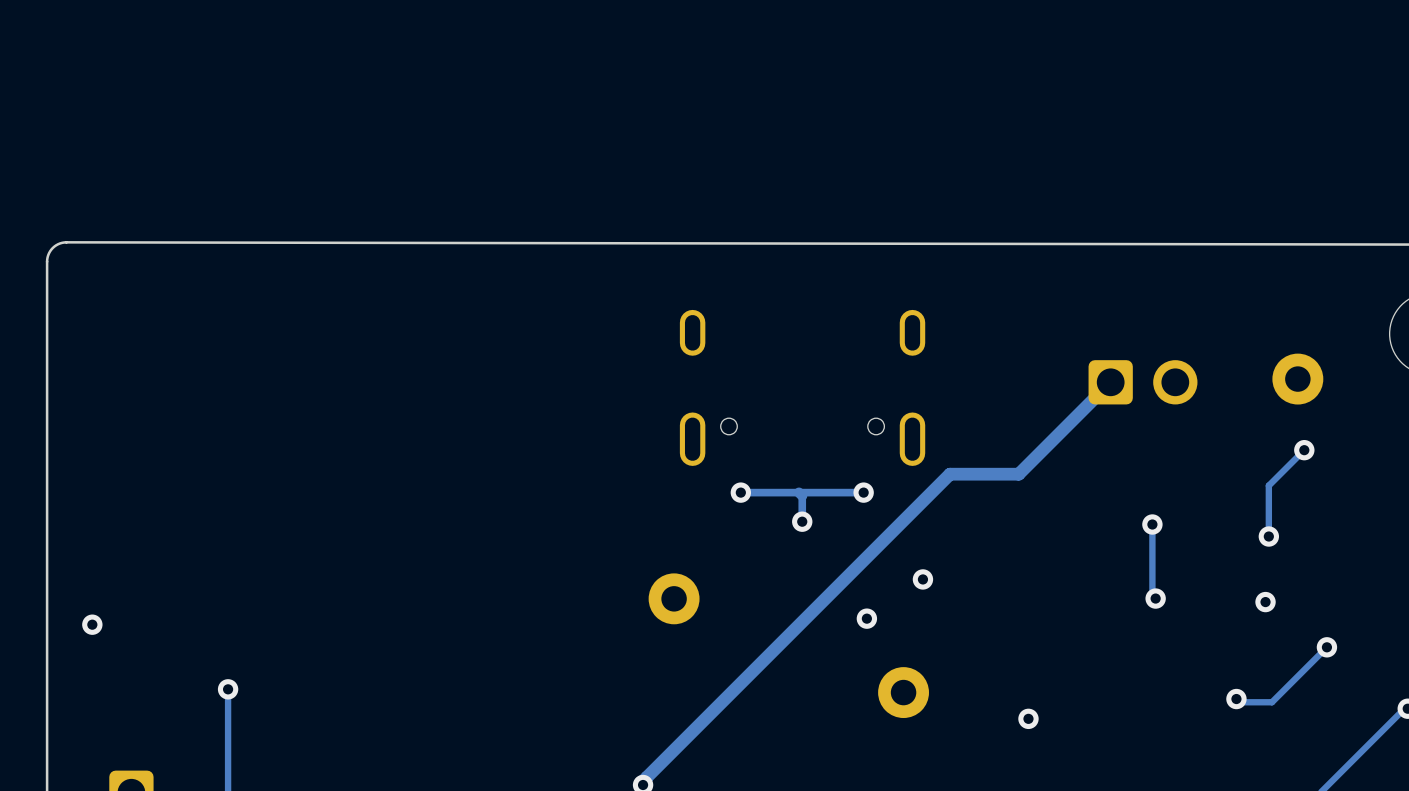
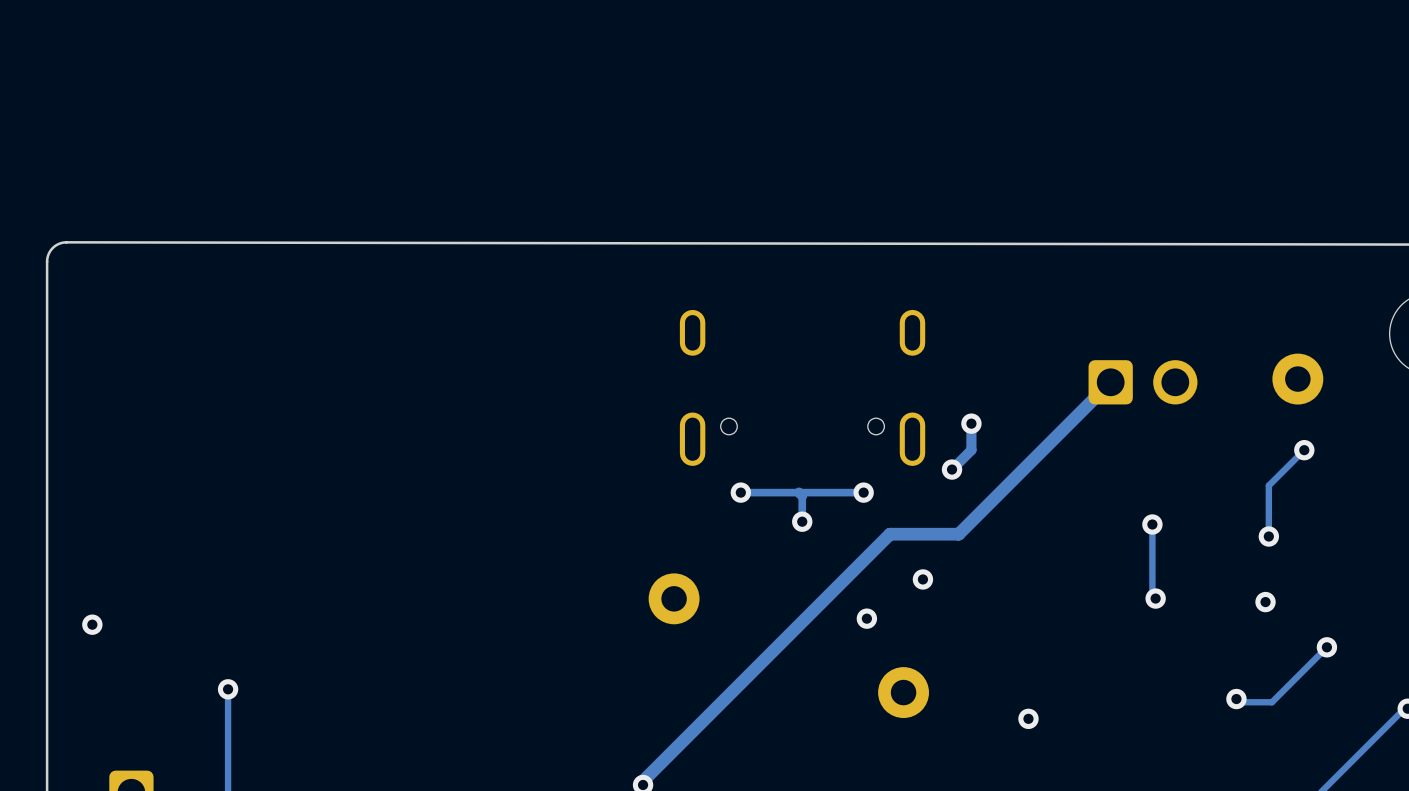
track: none -> (971, 423) (971, 450) (952, 469)
via: none -> (971, 423)
via: none -> (952, 469)
track: (1018, 474) (949, 474) (889, 534) -> (1018, 474) (958, 534) (889, 534)

